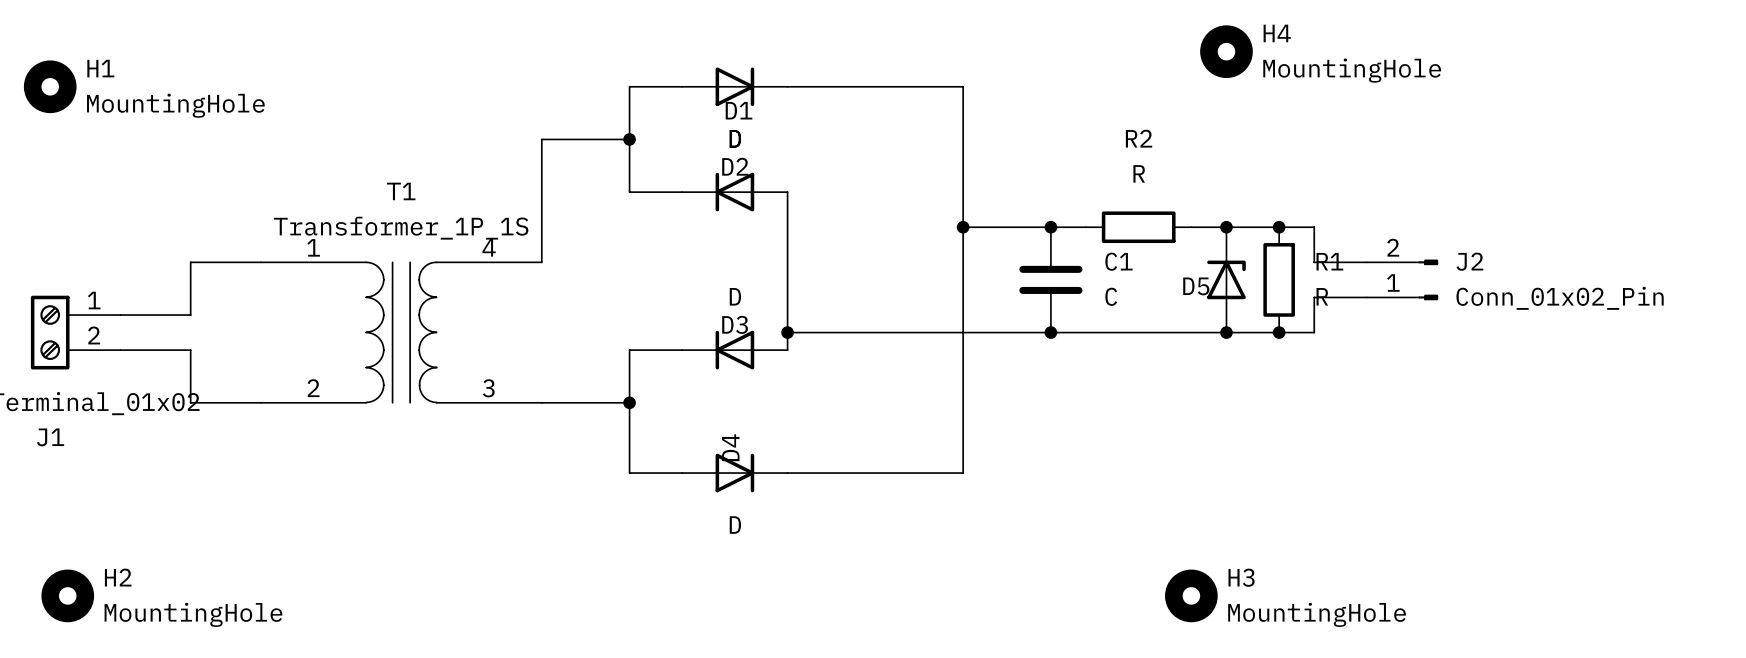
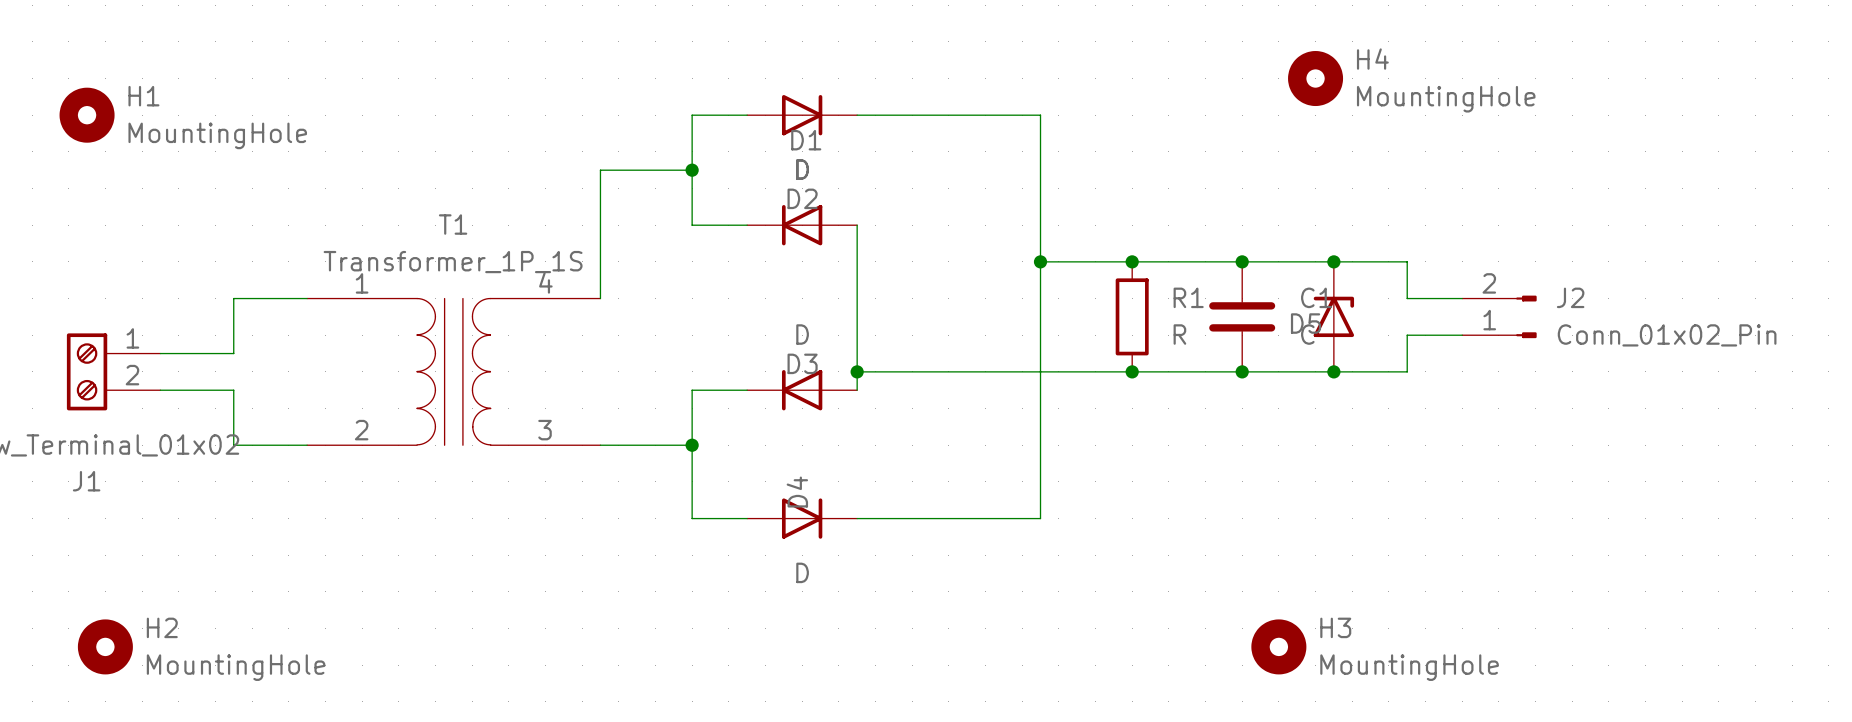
wire: none -> (1168, 261) (1278, 261)
R2: R (1138, 227) -> none
junction: none -> (1242, 261)
junction: (1226, 227) -> none
junction: none -> (1333, 261)
junction: (1279, 227) -> none
C1 position: (1050, 279) -> (1242, 316)
D5 position: (1226, 279) -> (1333, 316)
R1 position: (1279, 279) -> (1132, 316)
junction: none -> (1242, 371)
junction: (1226, 332) -> none
junction: none -> (1333, 371)
junction: (1279, 332) -> none

